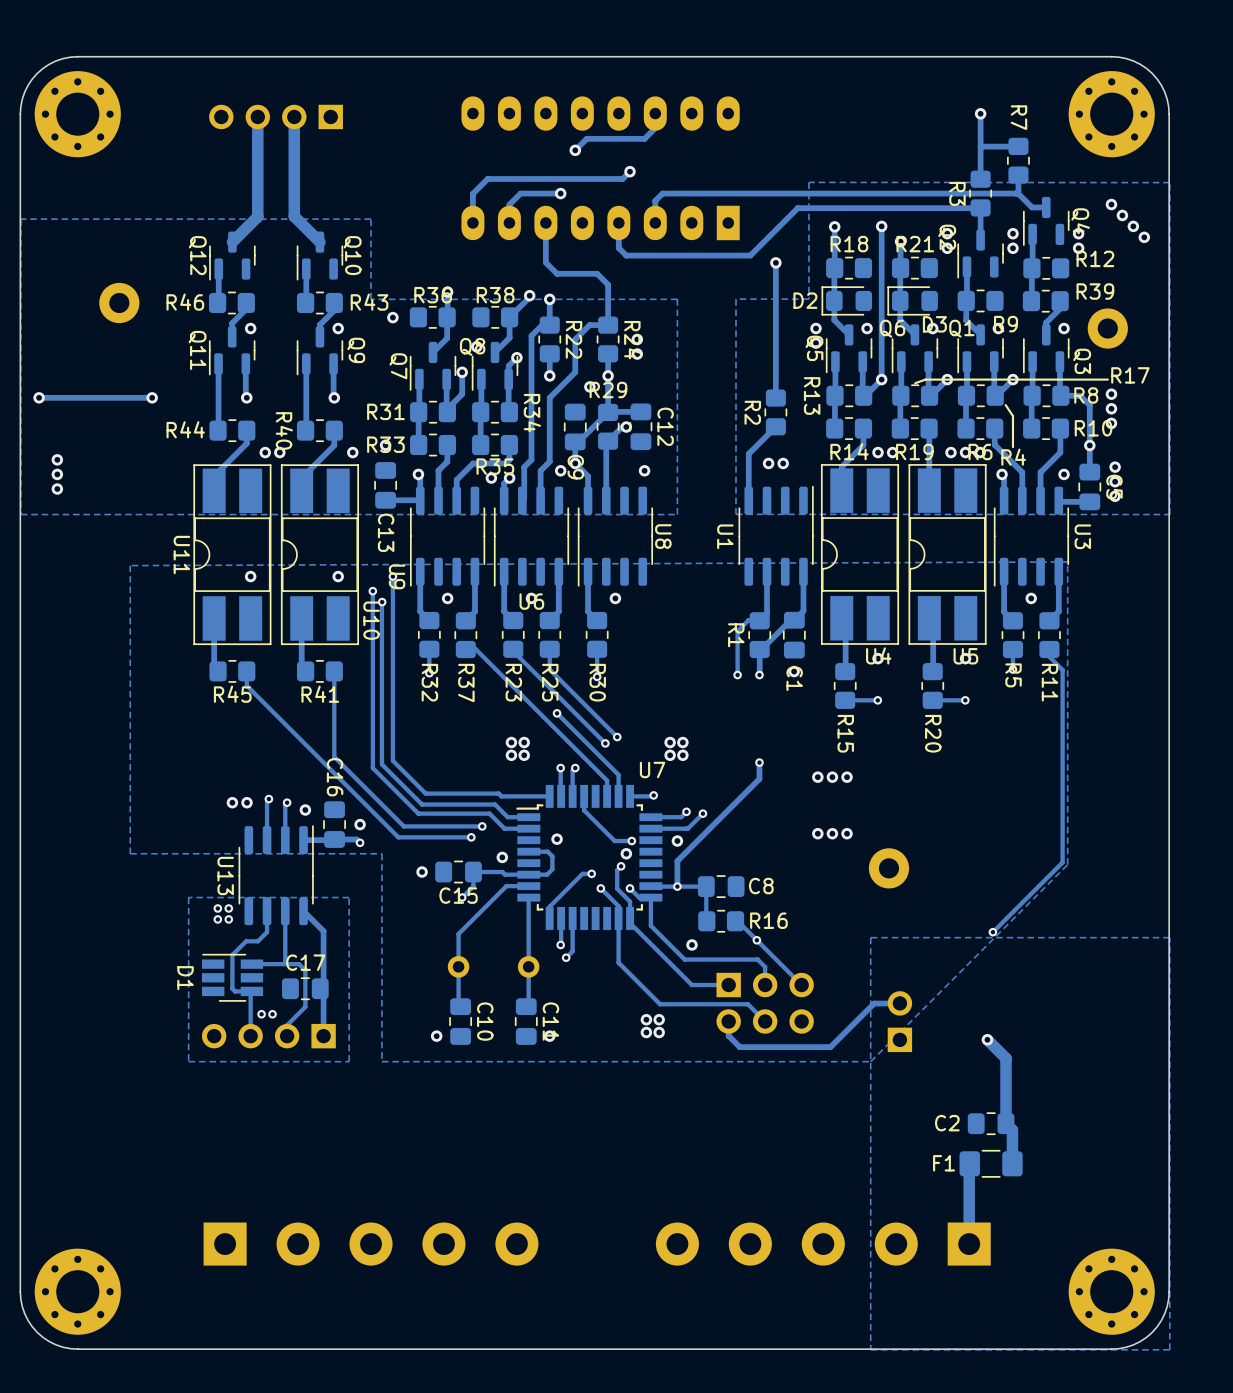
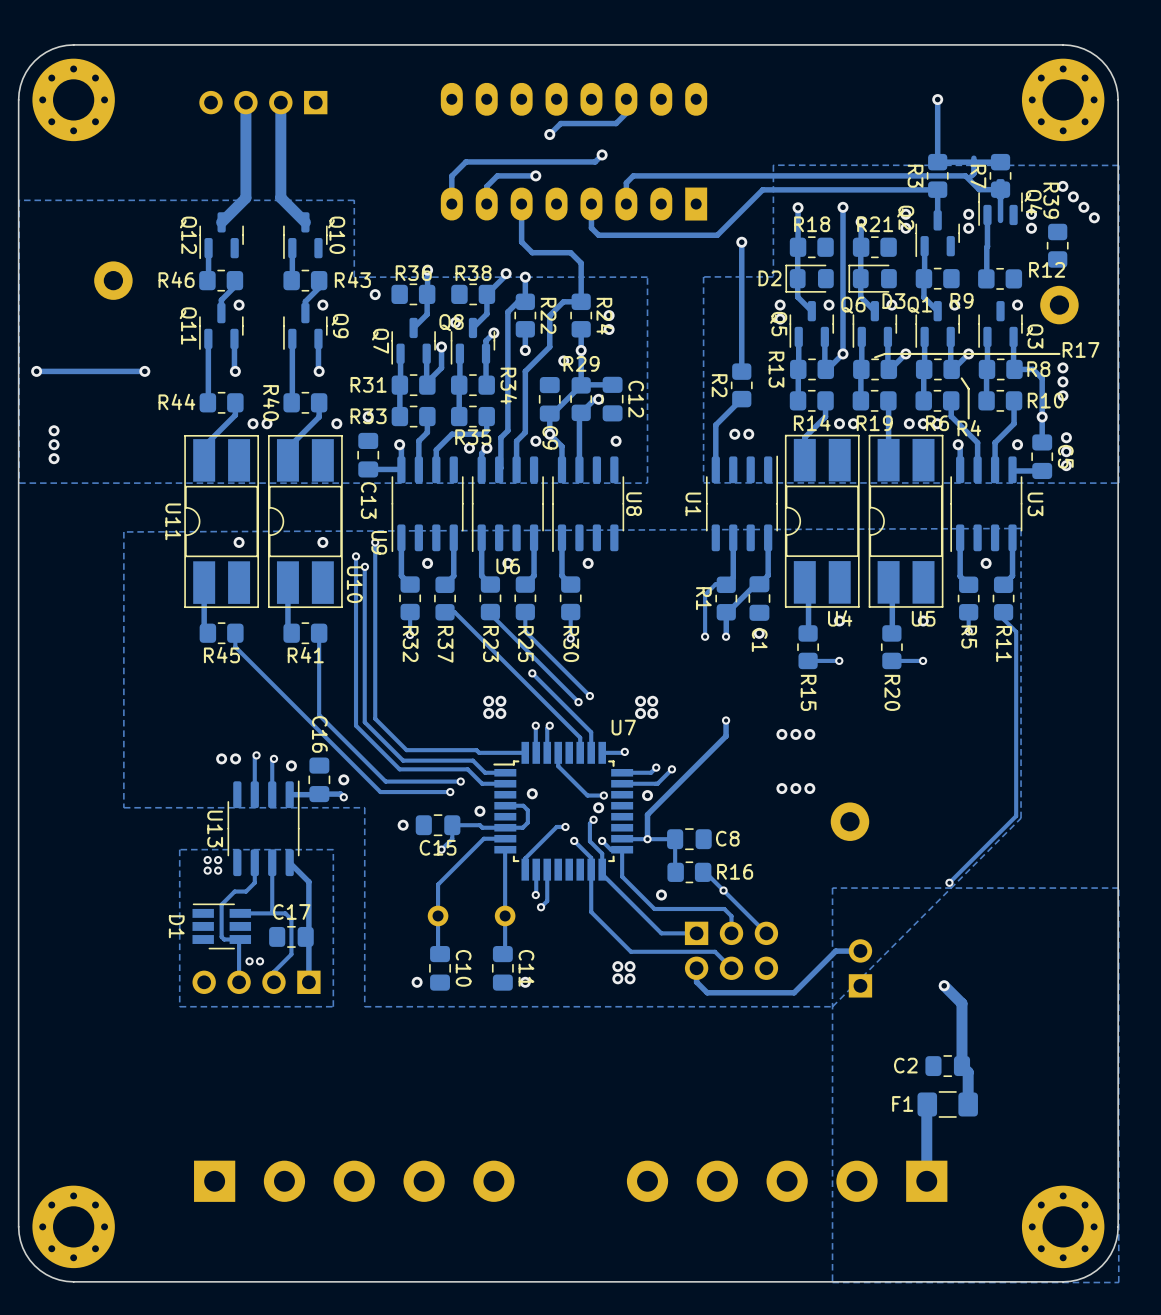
R7 name position: R7 (1018, 117) -> R7 (978, 176)
track: (1018, 146) (980, 146) -> none
R7 position: (1018, 160) -> (1000, 175)
track: none -> (1000, 162) (937, 162)
track: (1009, 193) (1018, 193) (1032, 207) (1046, 207) -> (965, 175) (979, 189) (1000, 189) (1000, 220)
R39: none -> (1057, 245)
R12: (1046, 268) -> none
R39 name: R39 (1095, 291) -> R12 (1047, 269)
track: (1060, 301) (1060, 308) (1046, 322) (1046, 334) -> none

